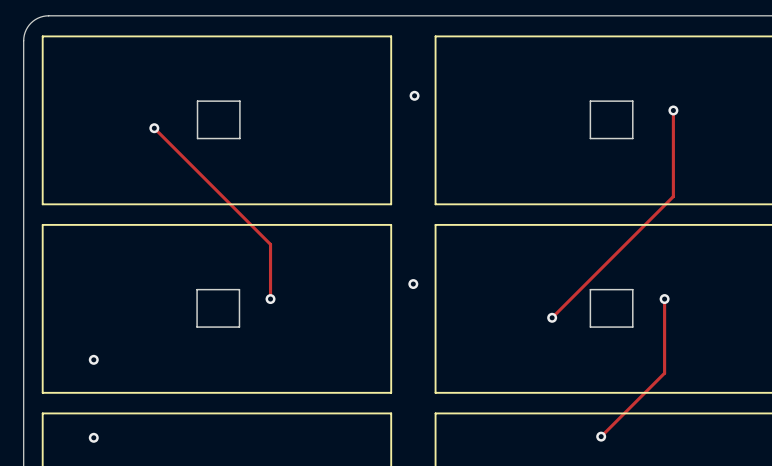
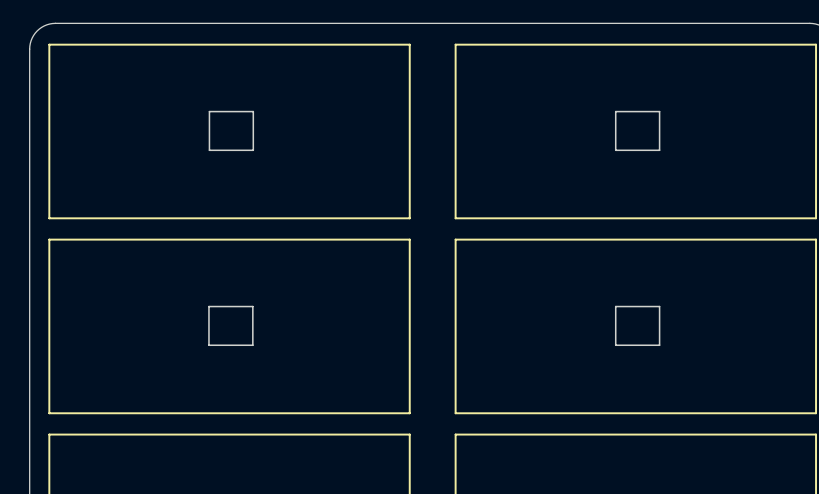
via: (414, 95) -> none
track: (673, 110) (673, 196) (552, 317) -> none
via: (673, 110) -> none
track: (154, 128) (270, 244) (270, 299) -> none
via: (154, 128) -> none
via: (413, 284) -> none
via: (270, 299) -> none
track: (664, 299) (664, 373) (601, 436) -> none
via: (664, 299) -> none
via: (552, 317) -> none
via: (93, 359) -> none
via: (601, 436) -> none
via: (93, 437) -> none

